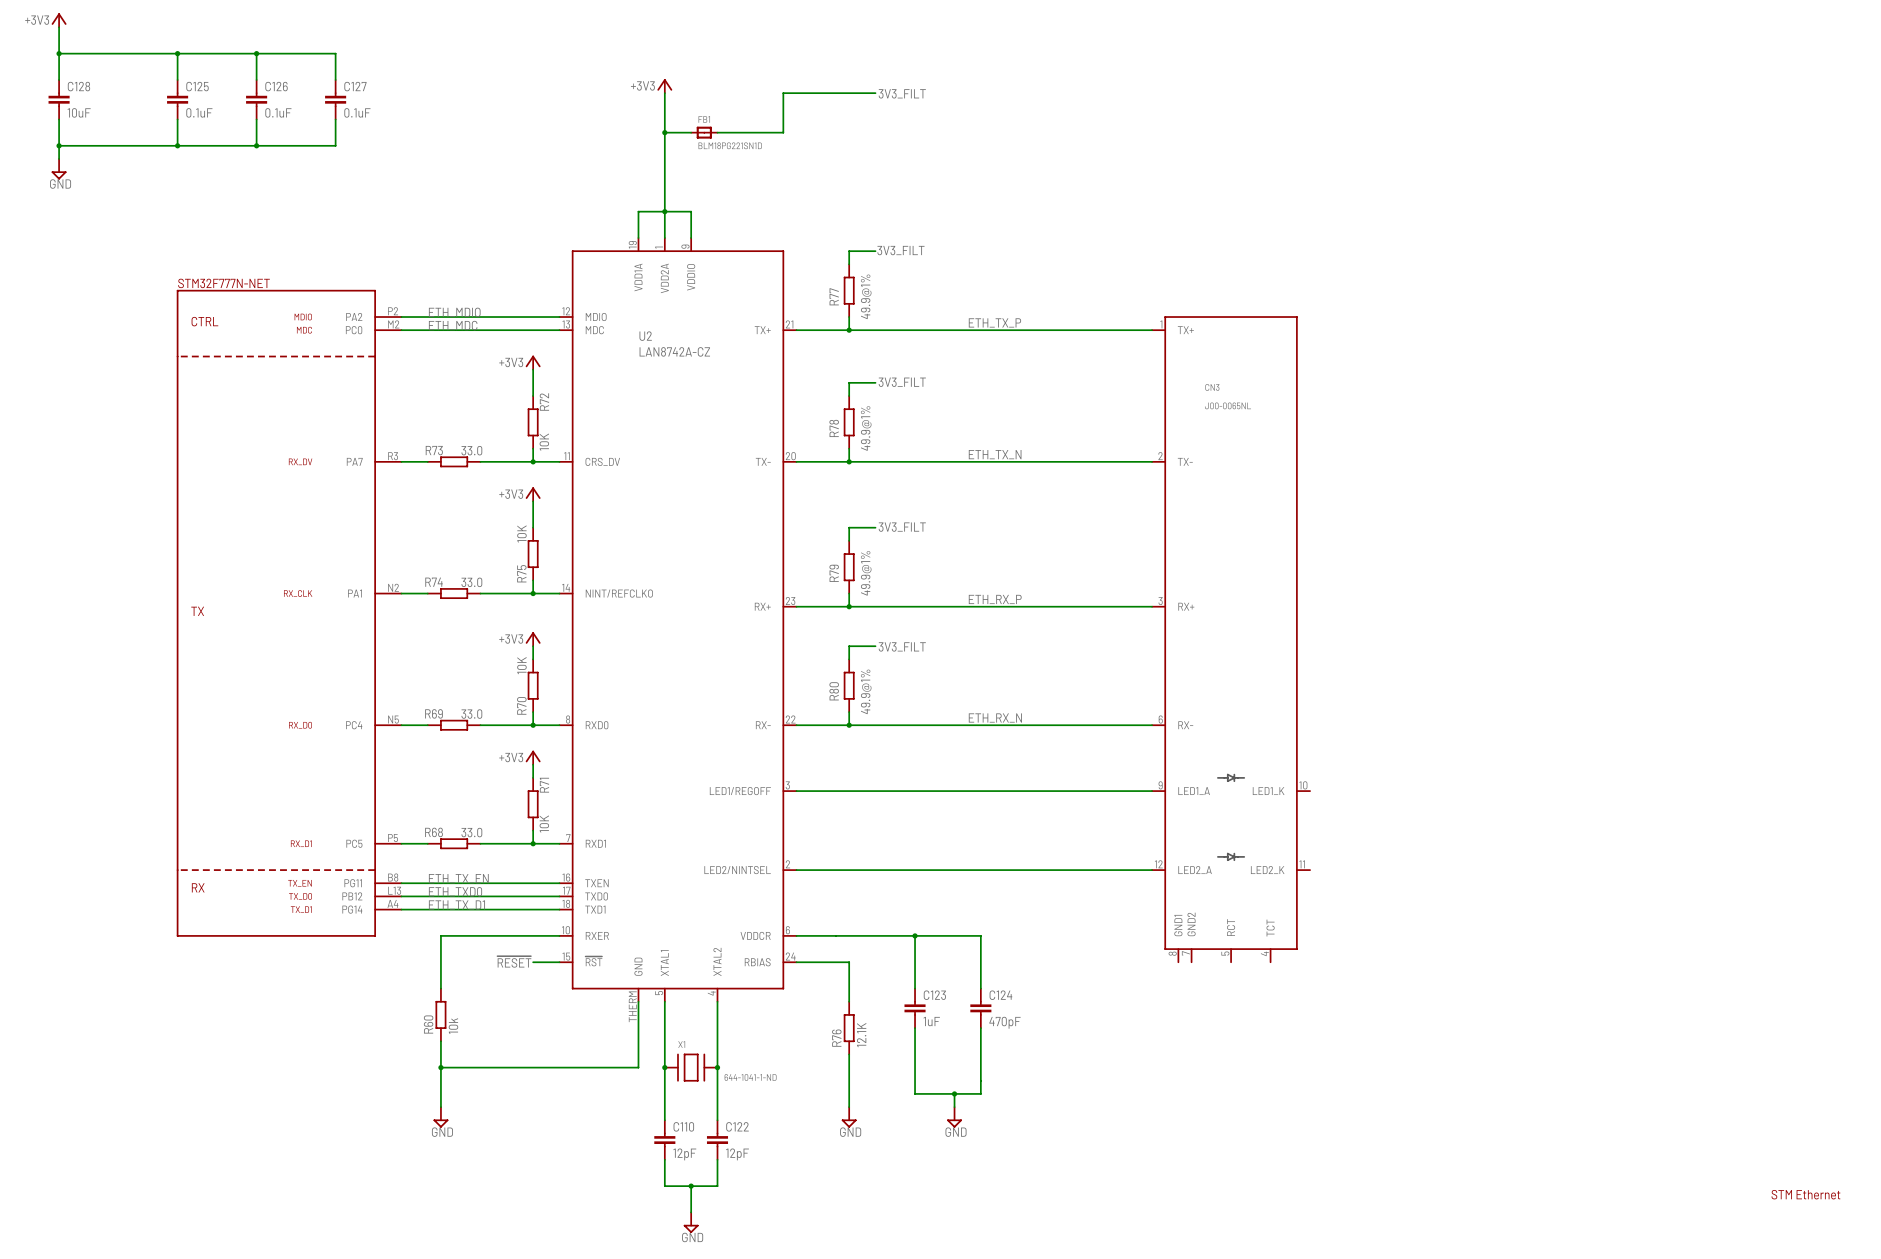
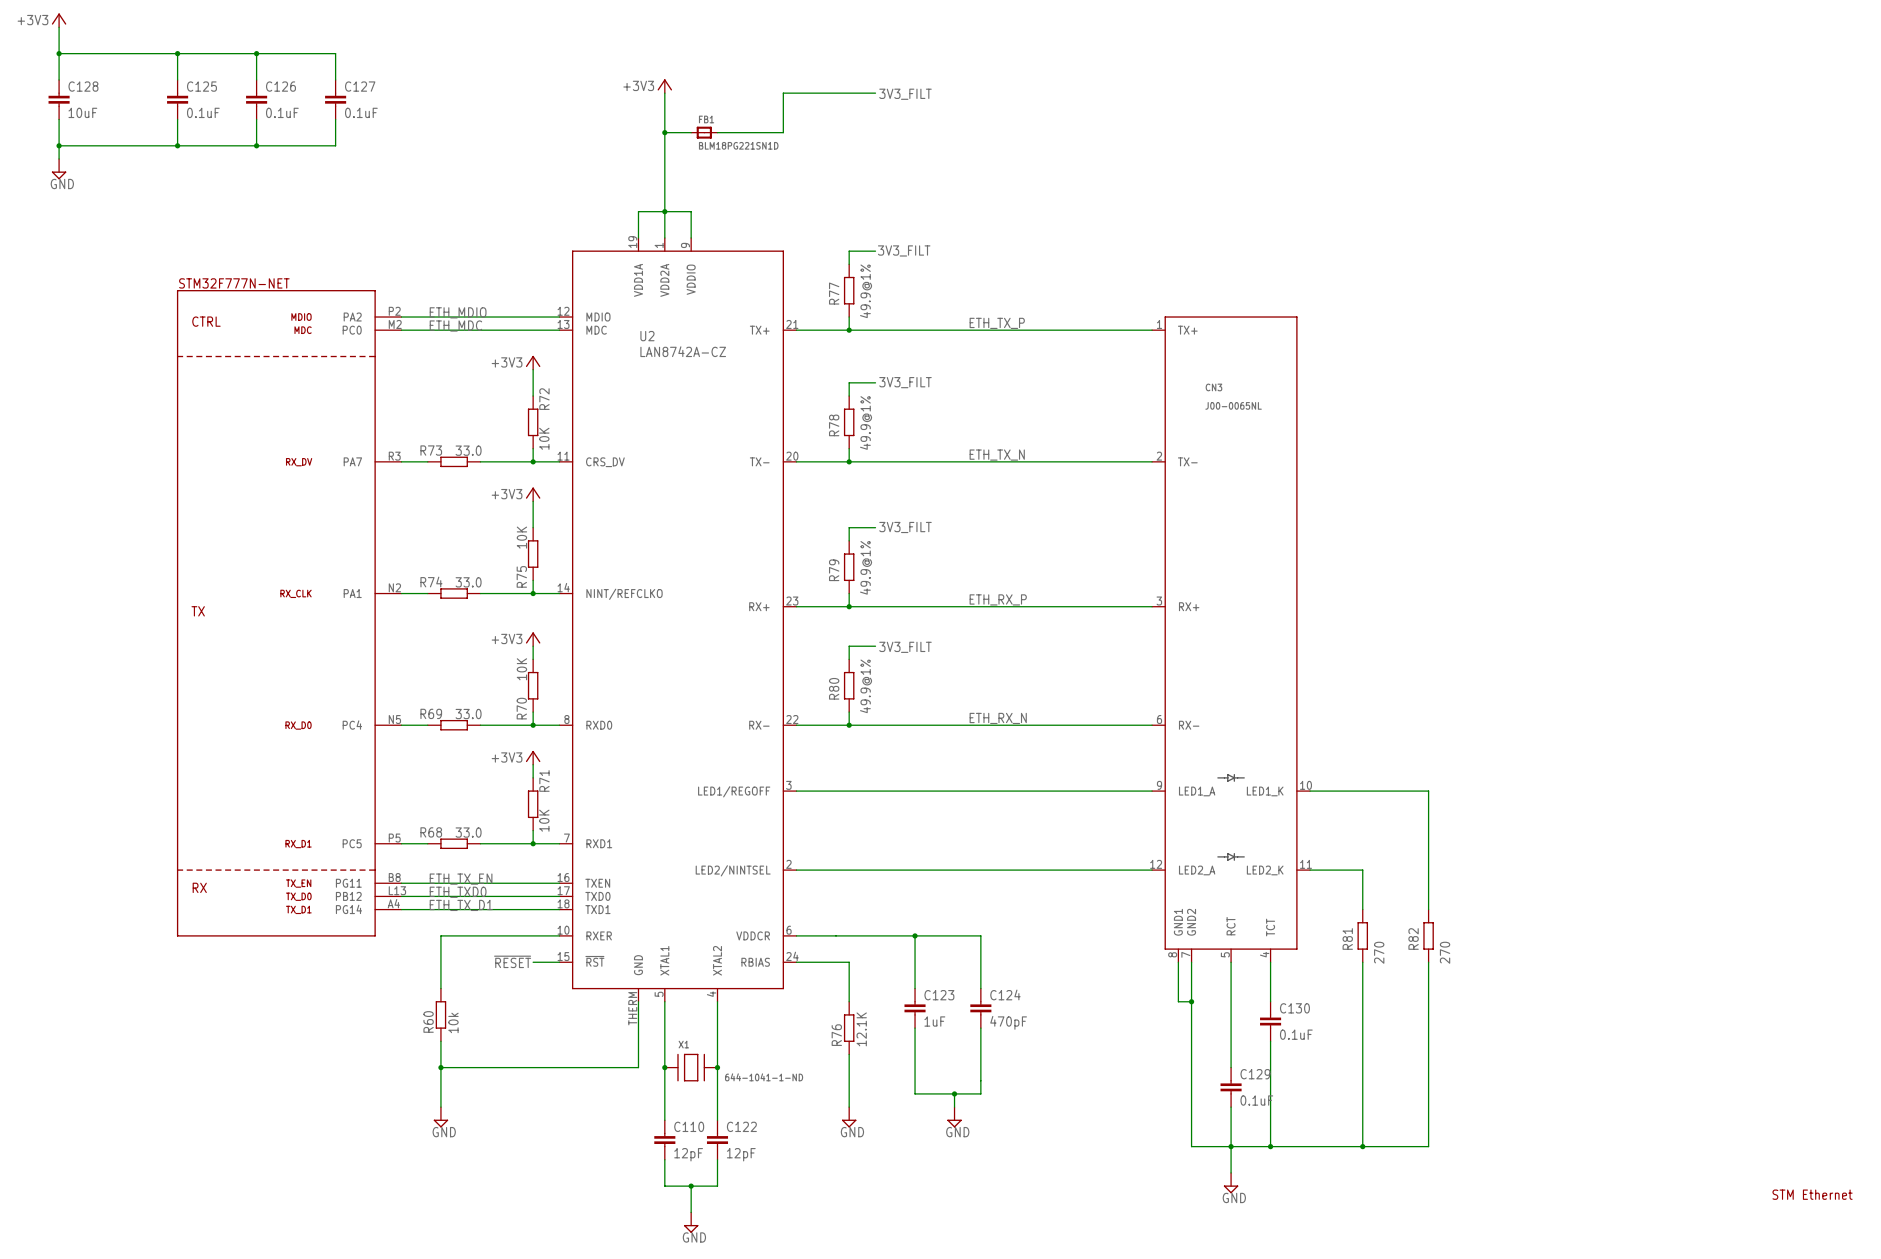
wire: none -> (1310, 791) (1428, 791) (1428, 909)
wire: none -> (1310, 870) (1362, 870) (1362, 909)
R81: none -> 270 (1362, 935)
R82: none -> 270 (1428, 935)
wire: none -> (1178, 962) (1178, 1001) (1191, 1001)
wire: none -> (1191, 962) (1191, 1146) (1428, 1146) (1428, 962)
wire: none -> (1231, 962) (1231, 1067)
wire: none -> (1270, 962) (1270, 1001)
wire: none -> (1362, 962) (1362, 1146)
junction: none -> (1191, 1001)
C130: none -> 0.1uF (1270, 1021)
wire: none -> (1270, 1041) (1270, 1146)
C129: none -> 0.1uF (1231, 1087)
wire: none -> (1231, 1107) (1231, 1172)
junction: none -> (1231, 1146)
junction: none -> (1270, 1146)
junction: none -> (1362, 1146)
power symbol: none -> GND (1231, 1183)

